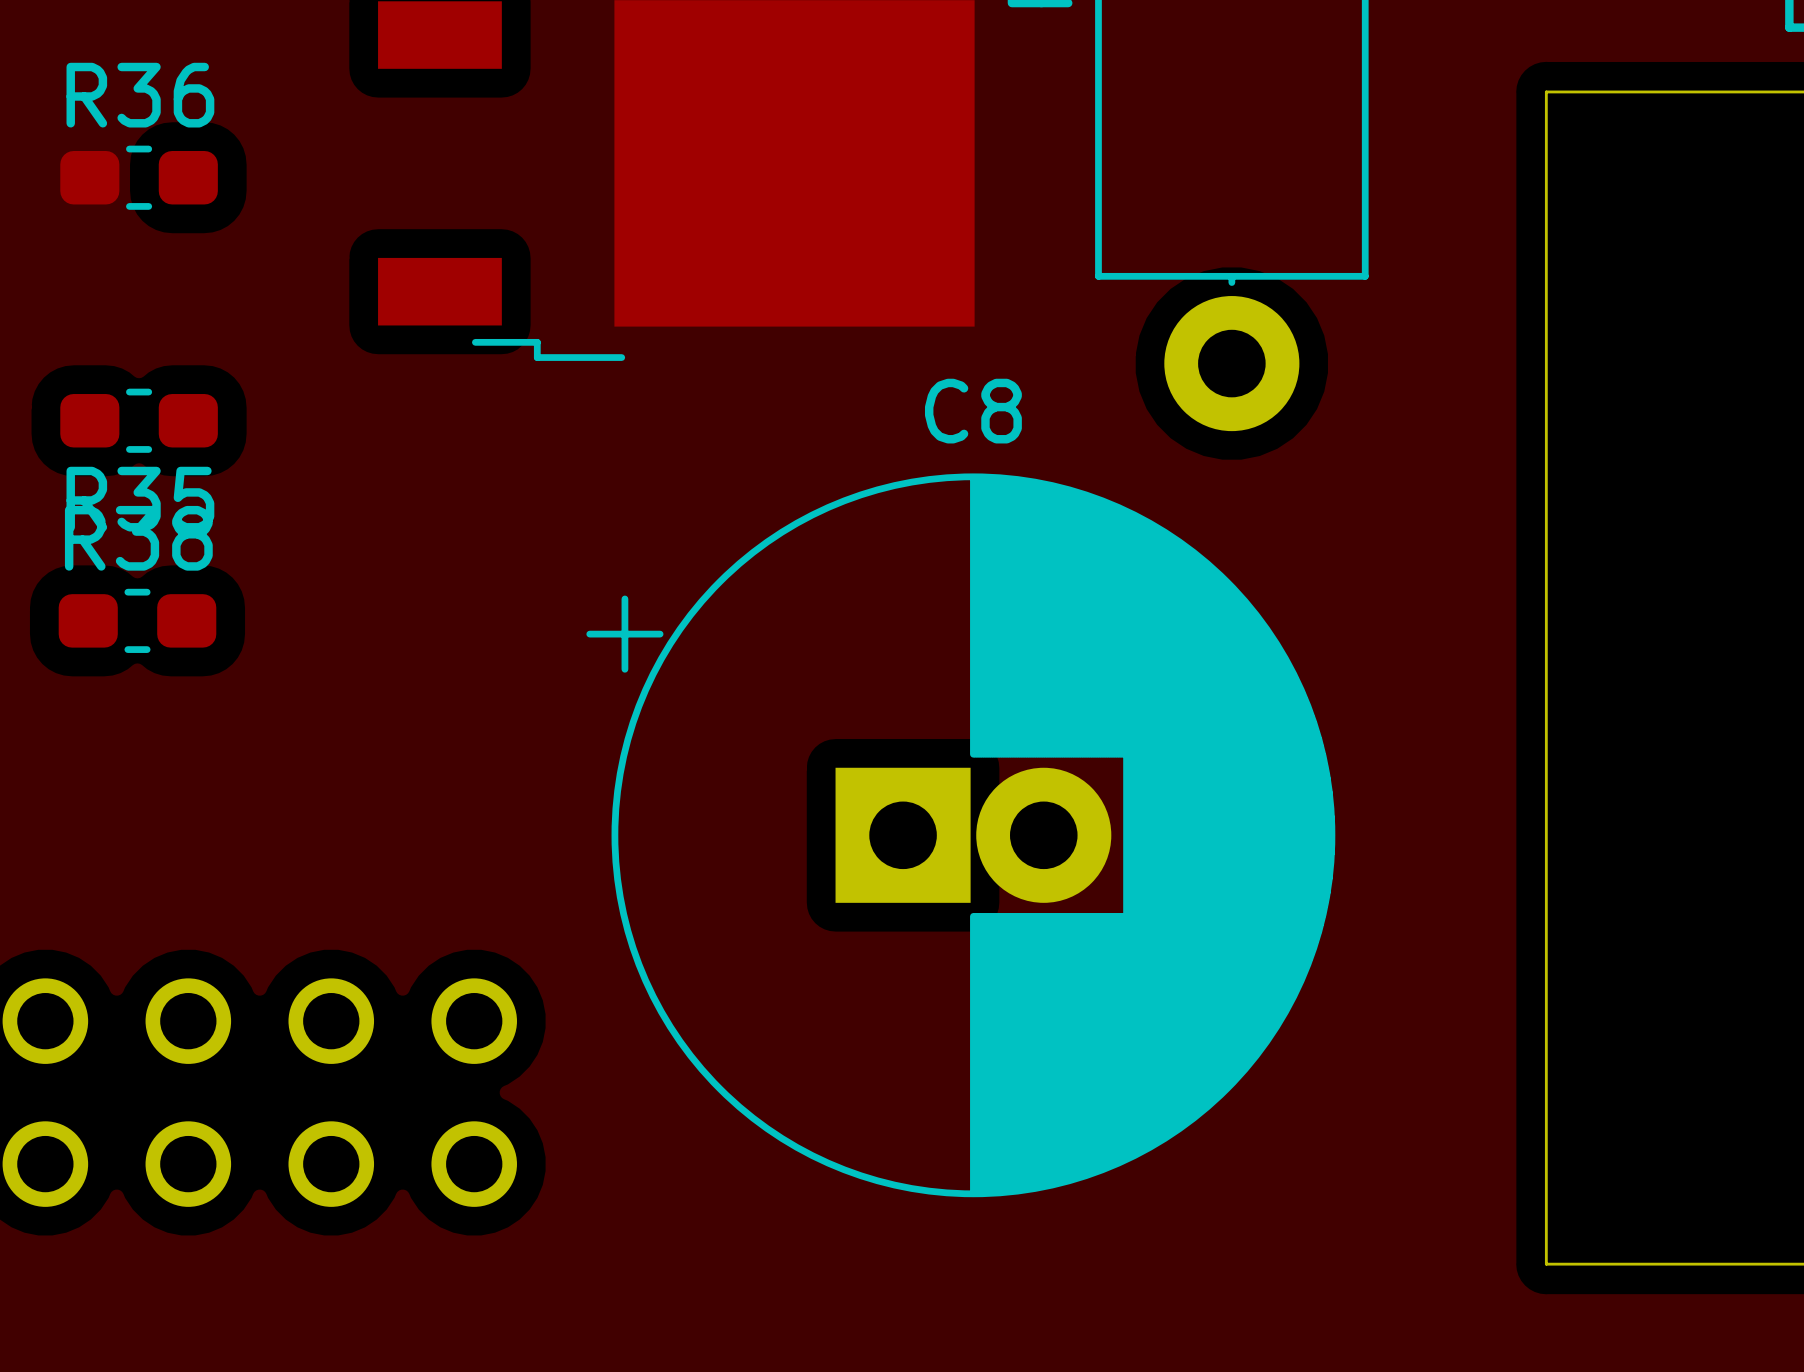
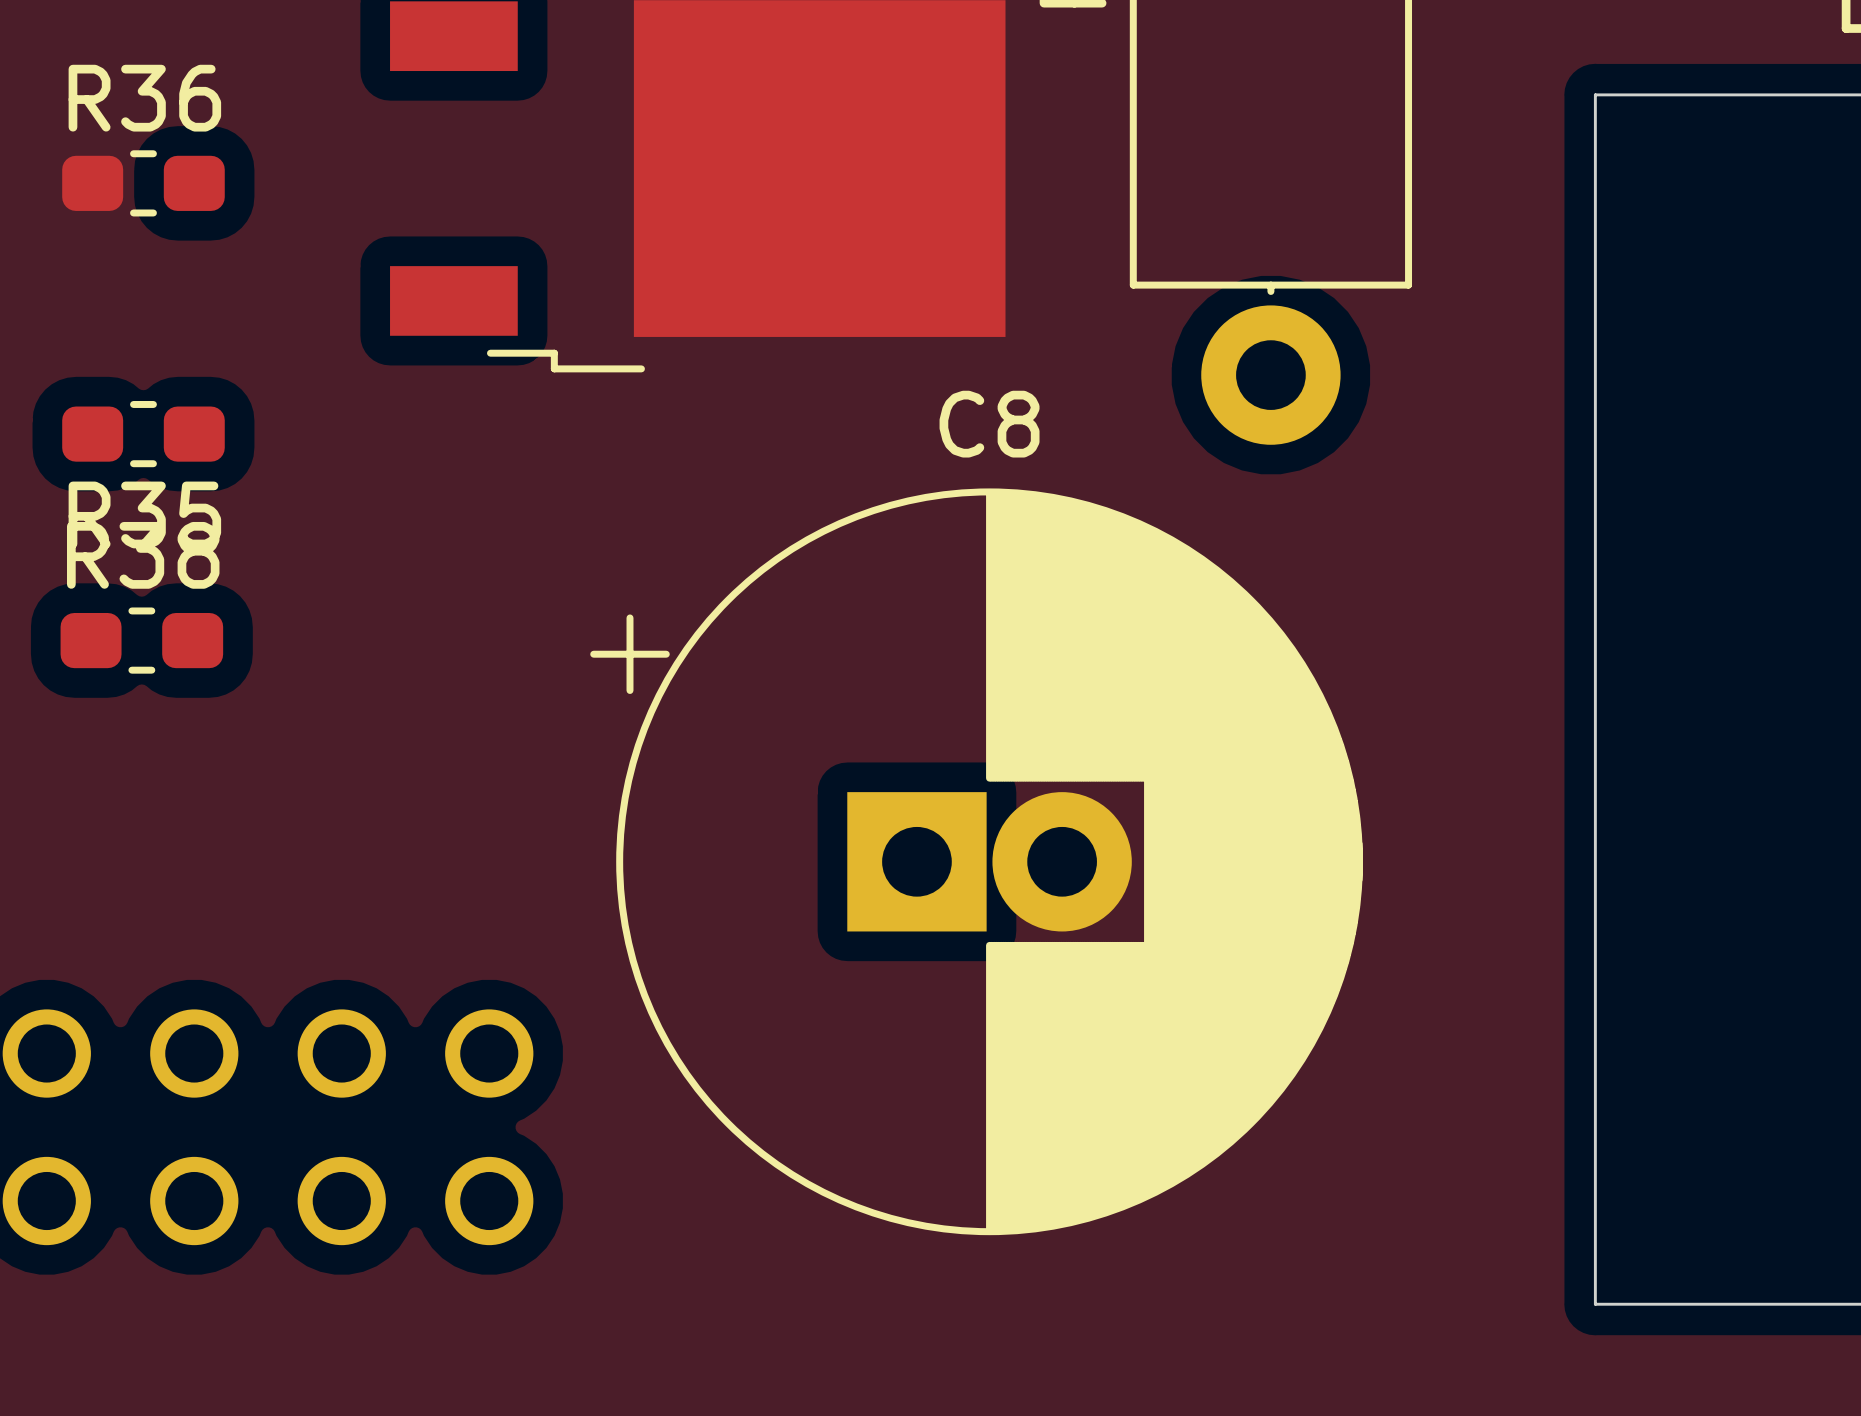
C8 position: (960, 835) -> (976, 861)

